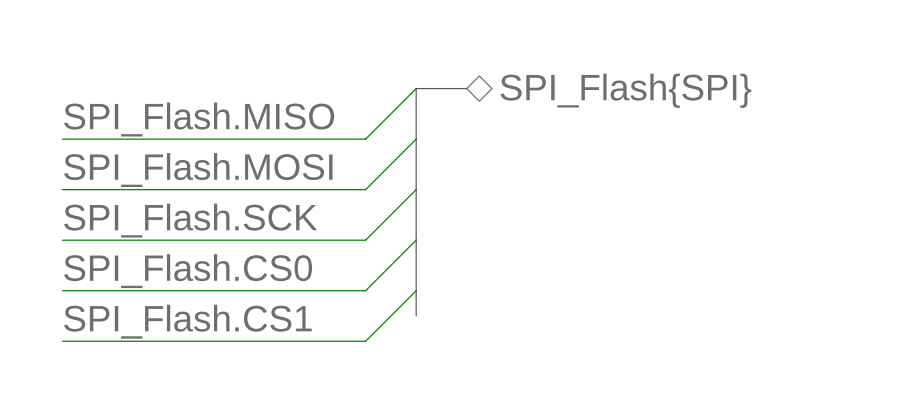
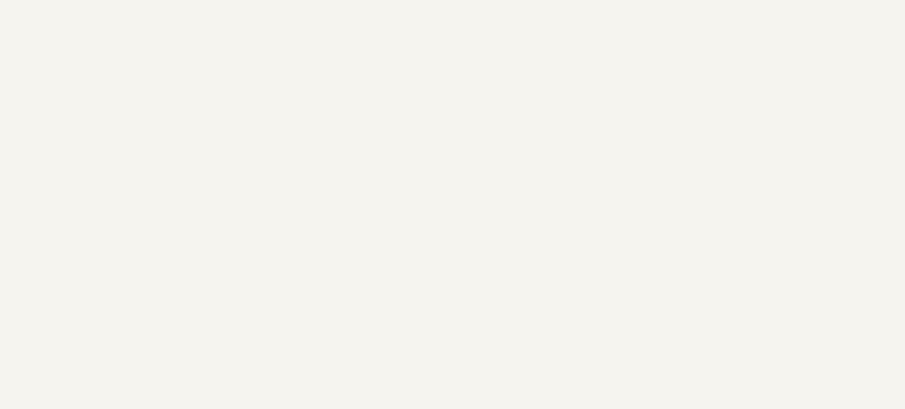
wire: (416, 88) (365, 139) (62, 139) -> none
bus: (466, 88) (416, 88) (416, 315) -> none
hierarchical label: SPI_Flash{SPI} (625, 90) -> none
label: SPI_Flash.MISO (199, 119) -> none
wire: (416, 139) (365, 189) (62, 189) -> none
label: SPI_Flash.MOSI (198, 170) -> none
wire: (416, 189) (365, 240) (62, 240) -> none
label: SPI_Flash.SCK (190, 220) -> none
wire: (416, 240) (365, 290) (62, 290) -> none
label: SPI_Flash.CS0 (188, 271) -> none
wire: (416, 290) (365, 341) (62, 341) -> none
label: SPI_Flash.CS1 (187, 321) -> none

